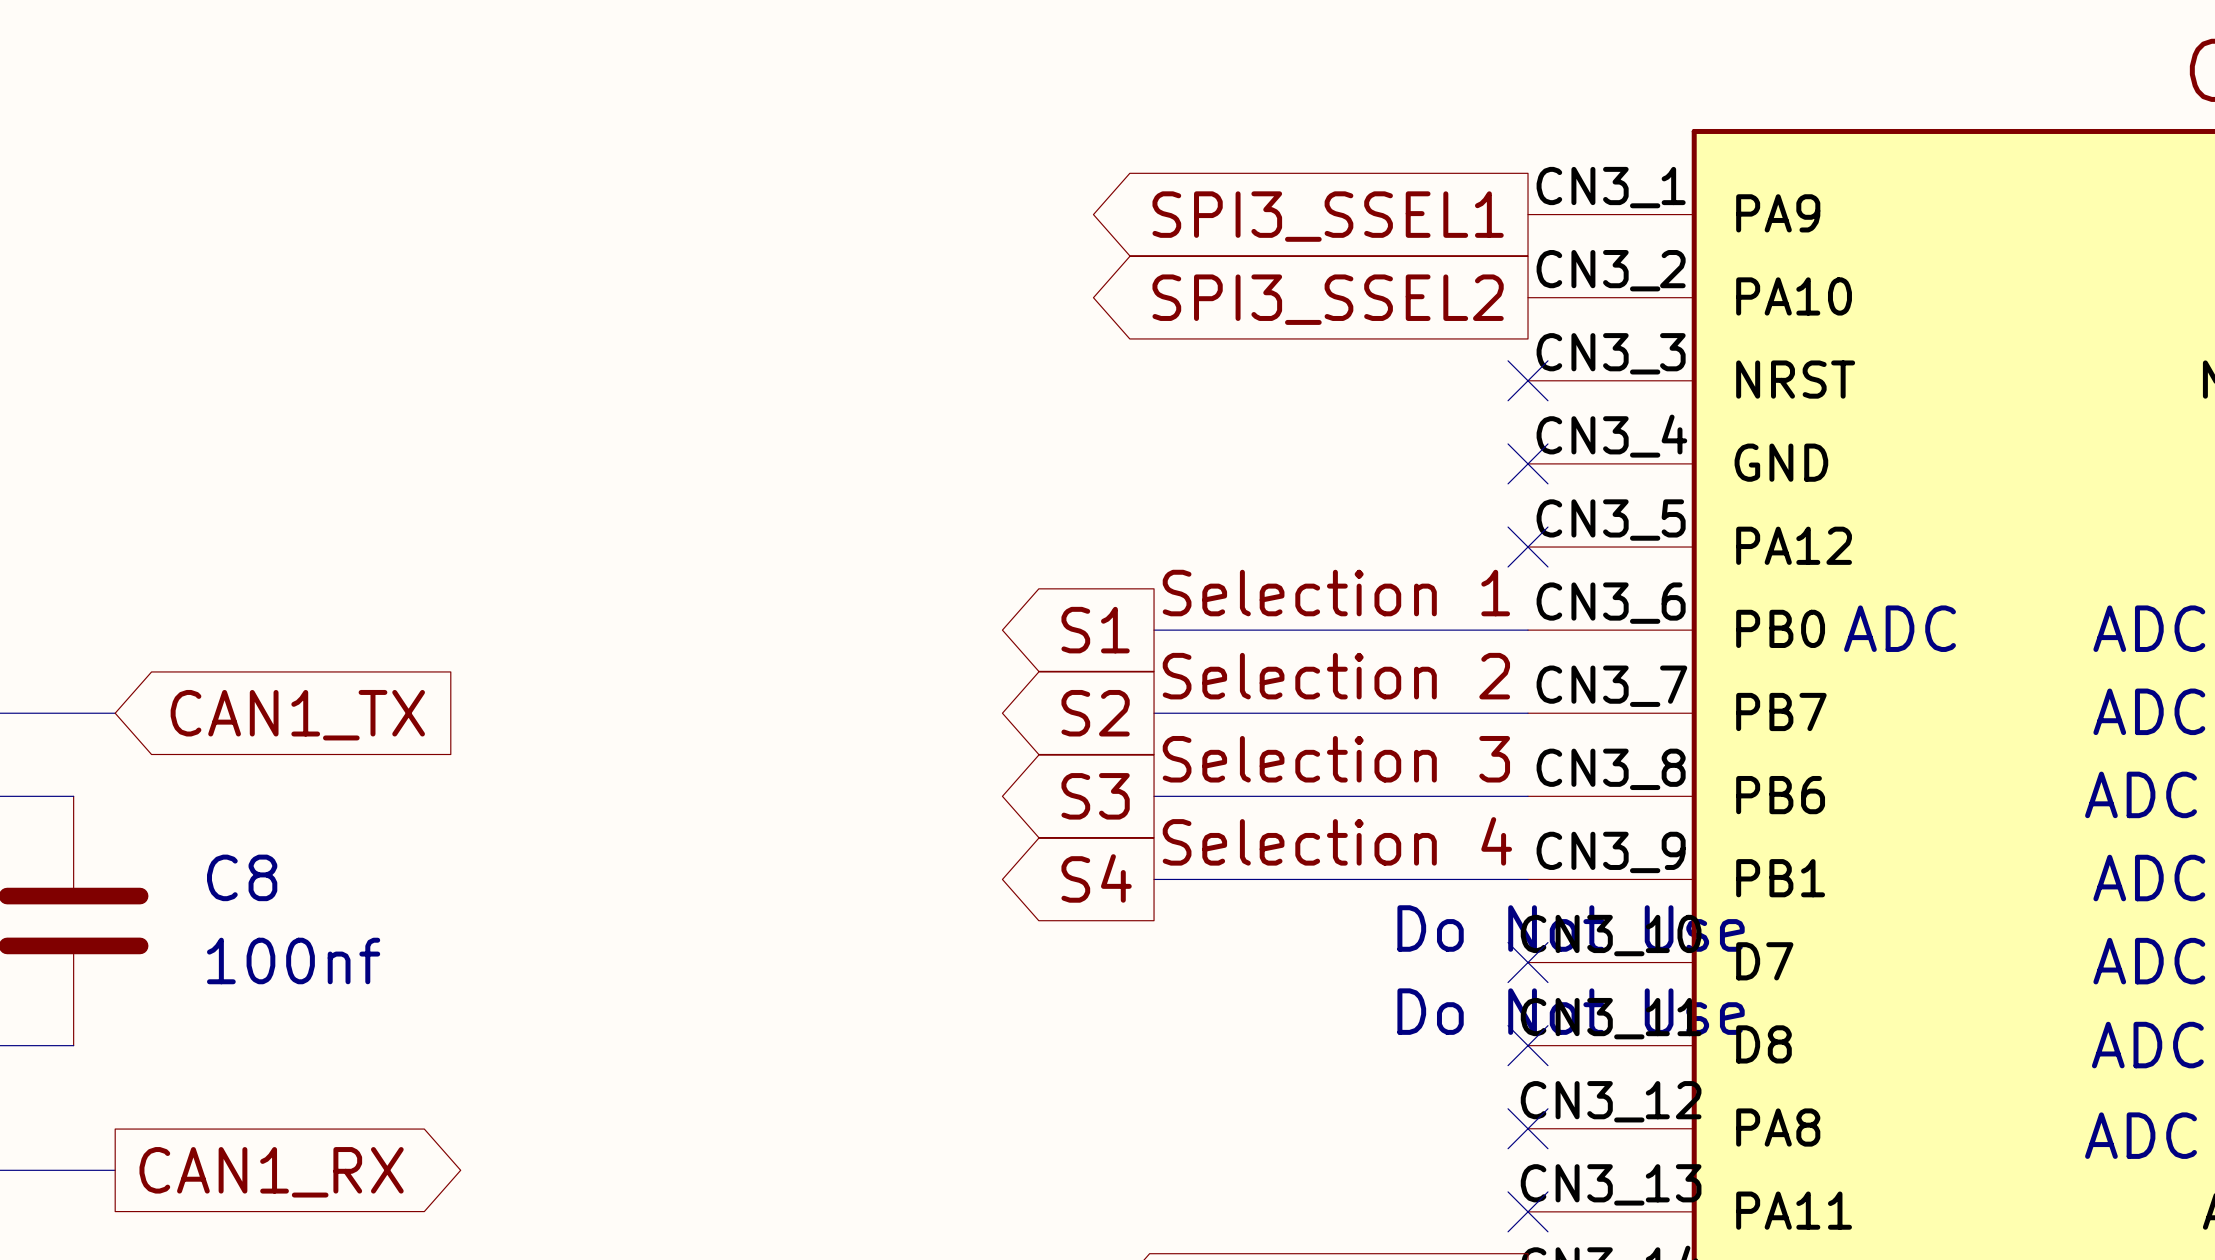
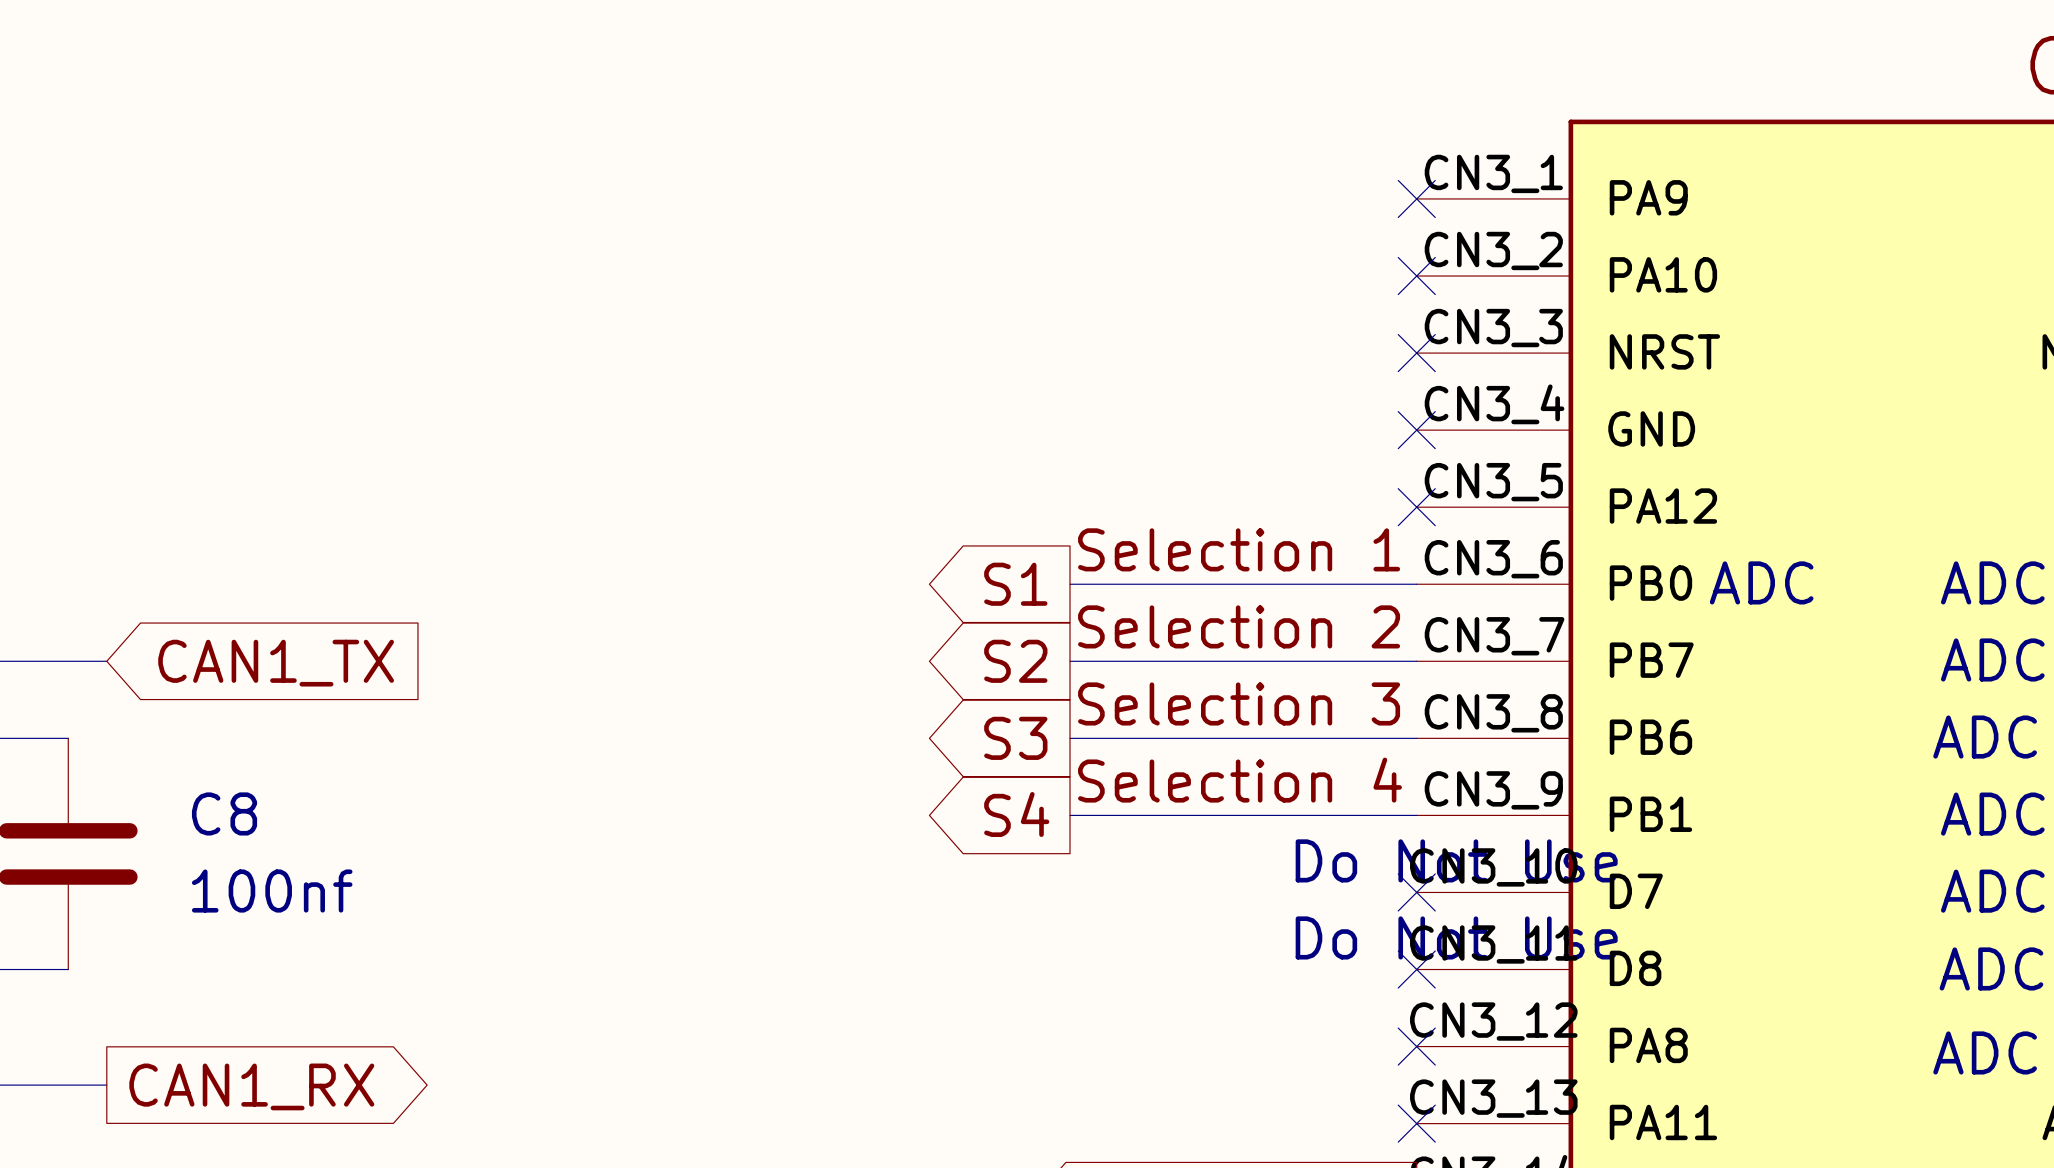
no-connect mark: none -> (1416, 198)
global label: SPI3_SSEL1 (1328, 216) -> none
no-connect mark: none -> (1416, 276)
global label: SPI3_SSEL2 (1328, 299) -> none

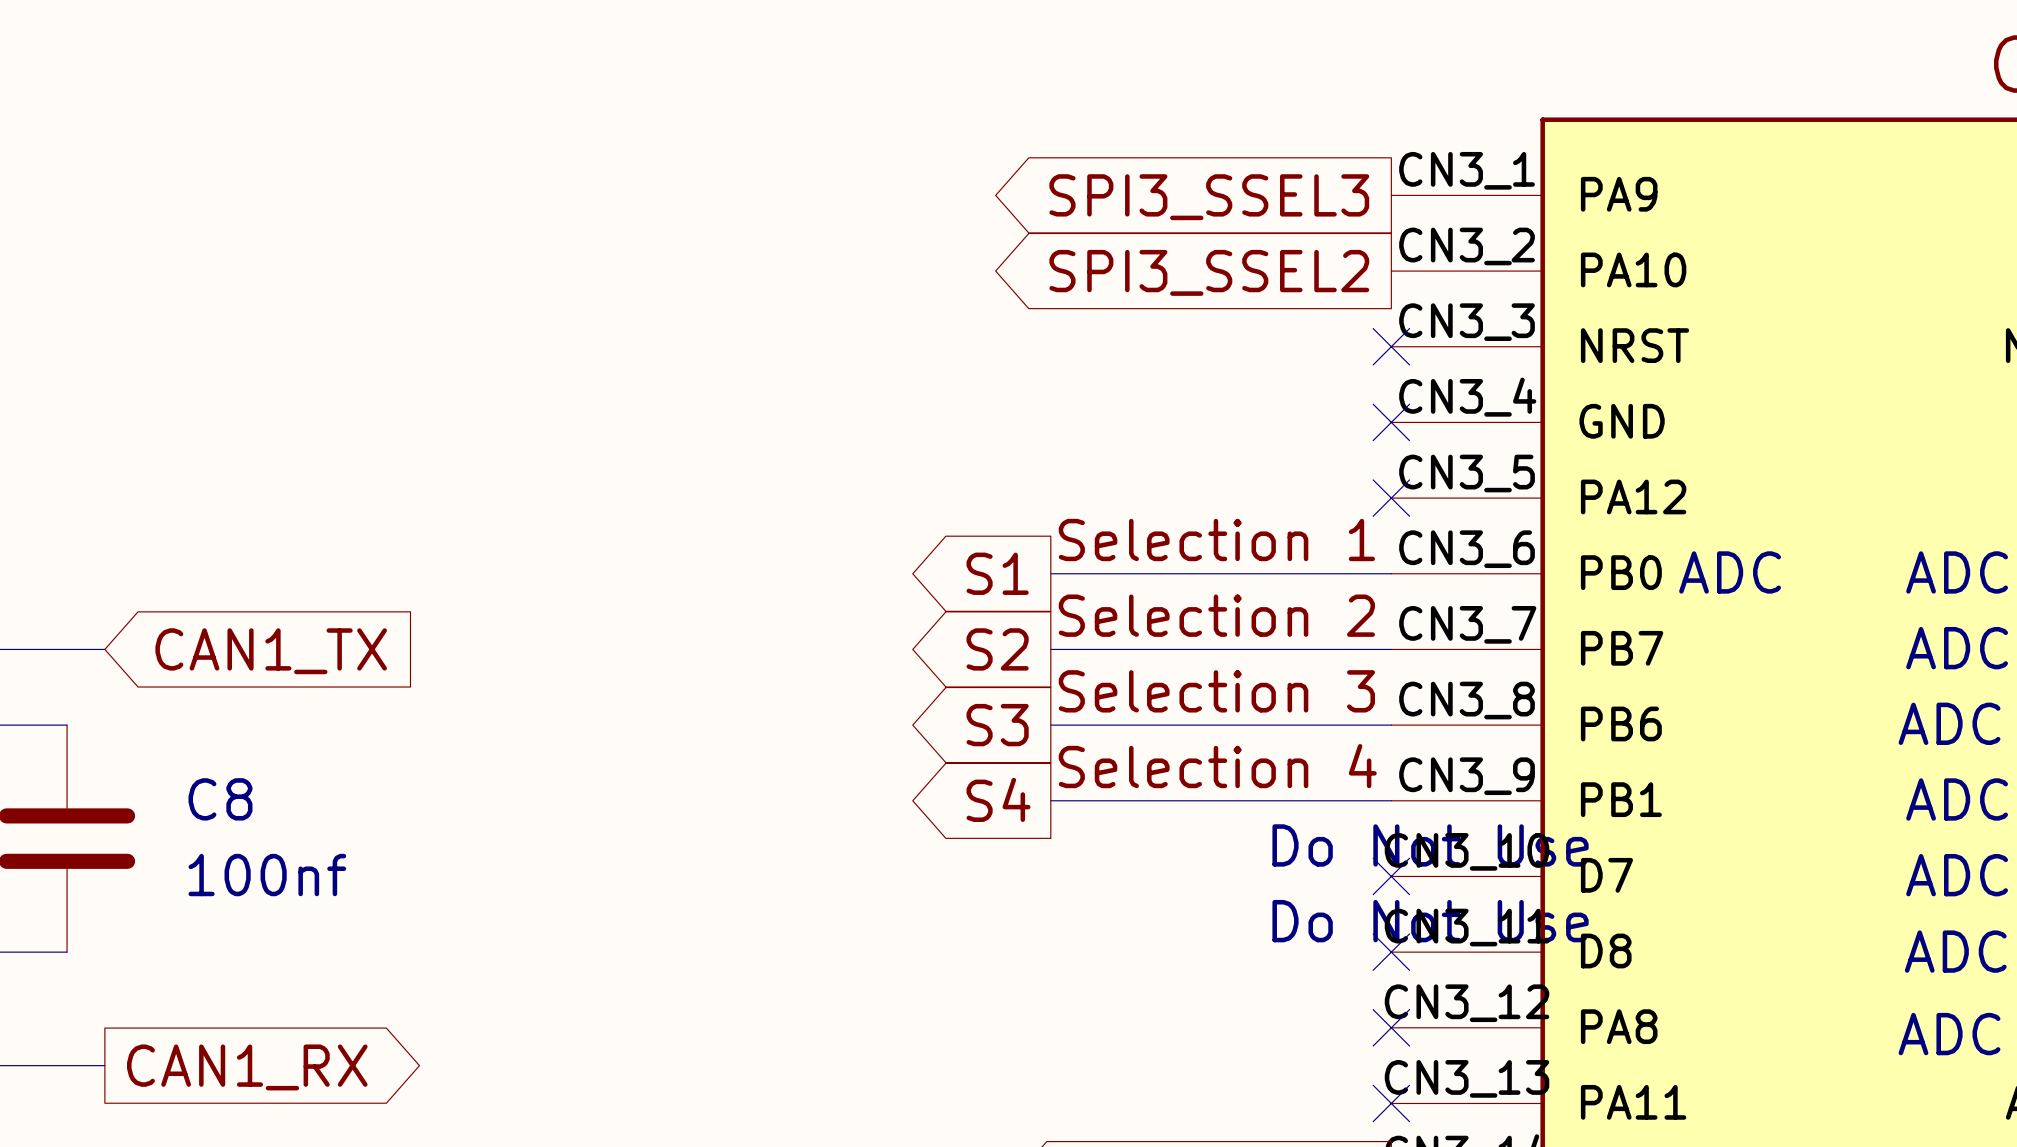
no-connect mark: (1416, 198) -> none
global label: none -> SPI3_SSEL3 (1209, 197)
no-connect mark: (1416, 276) -> none
global label: none -> SPI3_SSEL2 (1209, 272)

